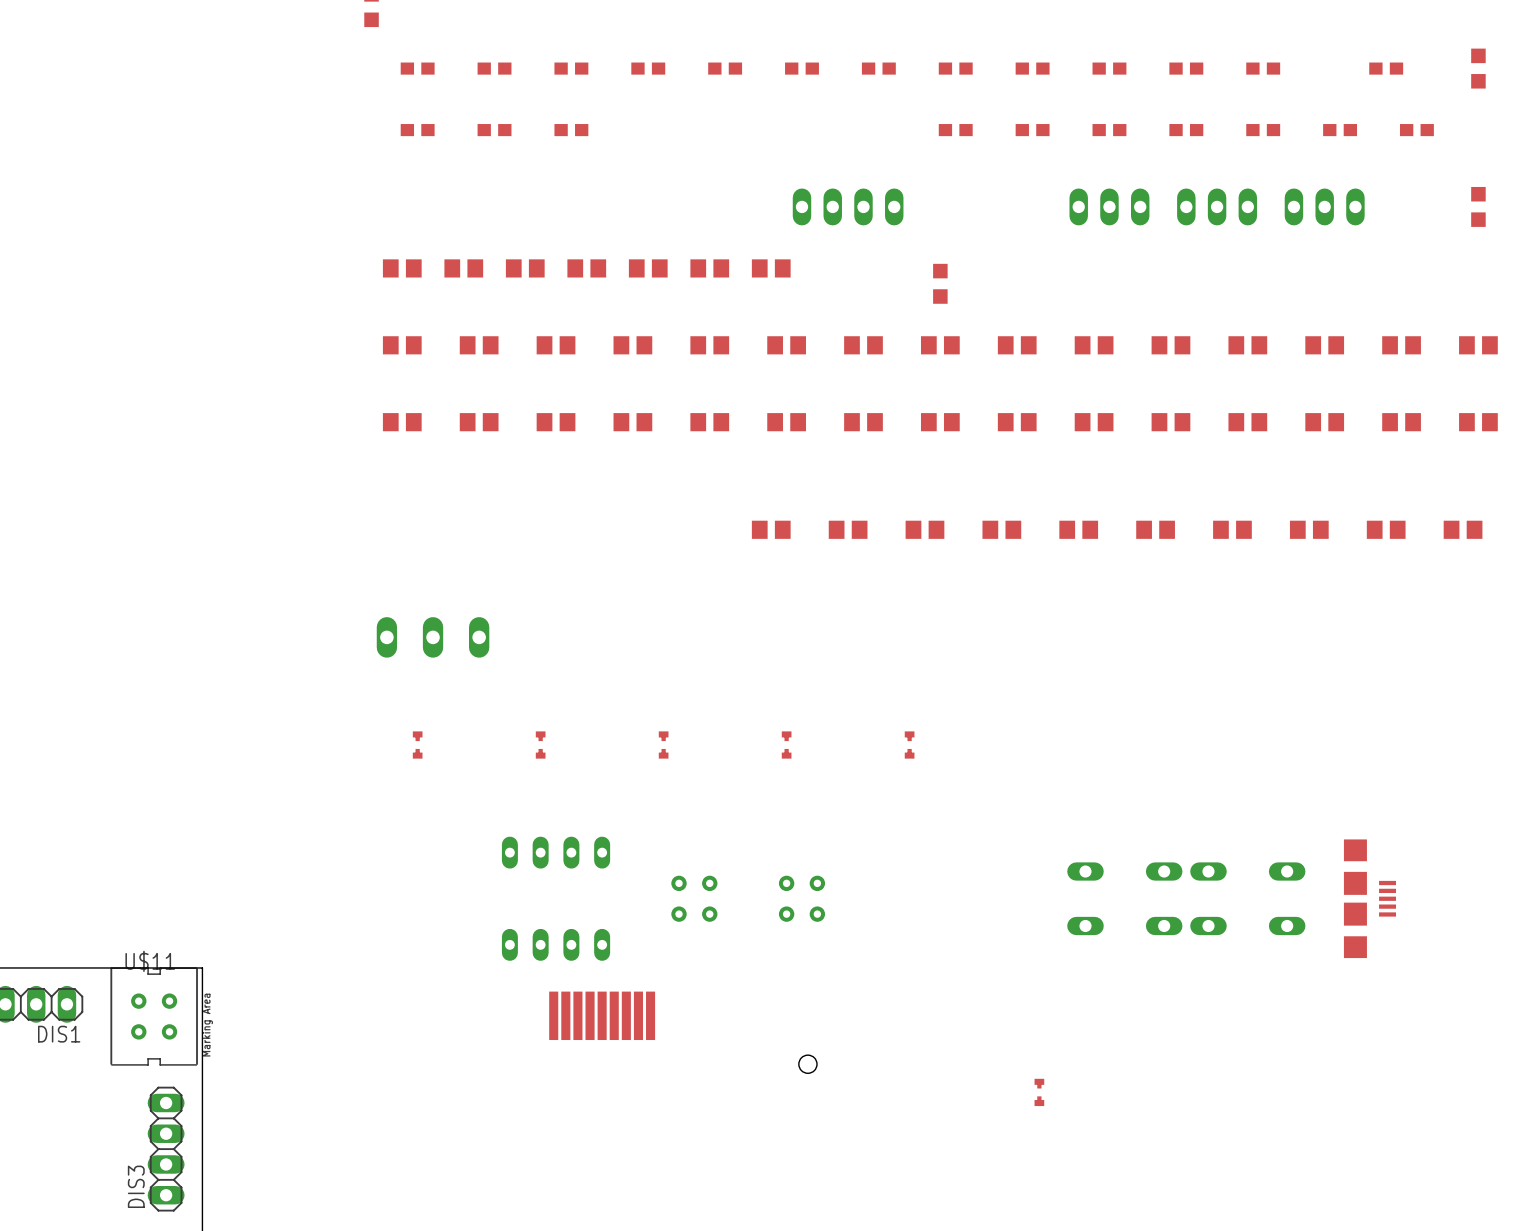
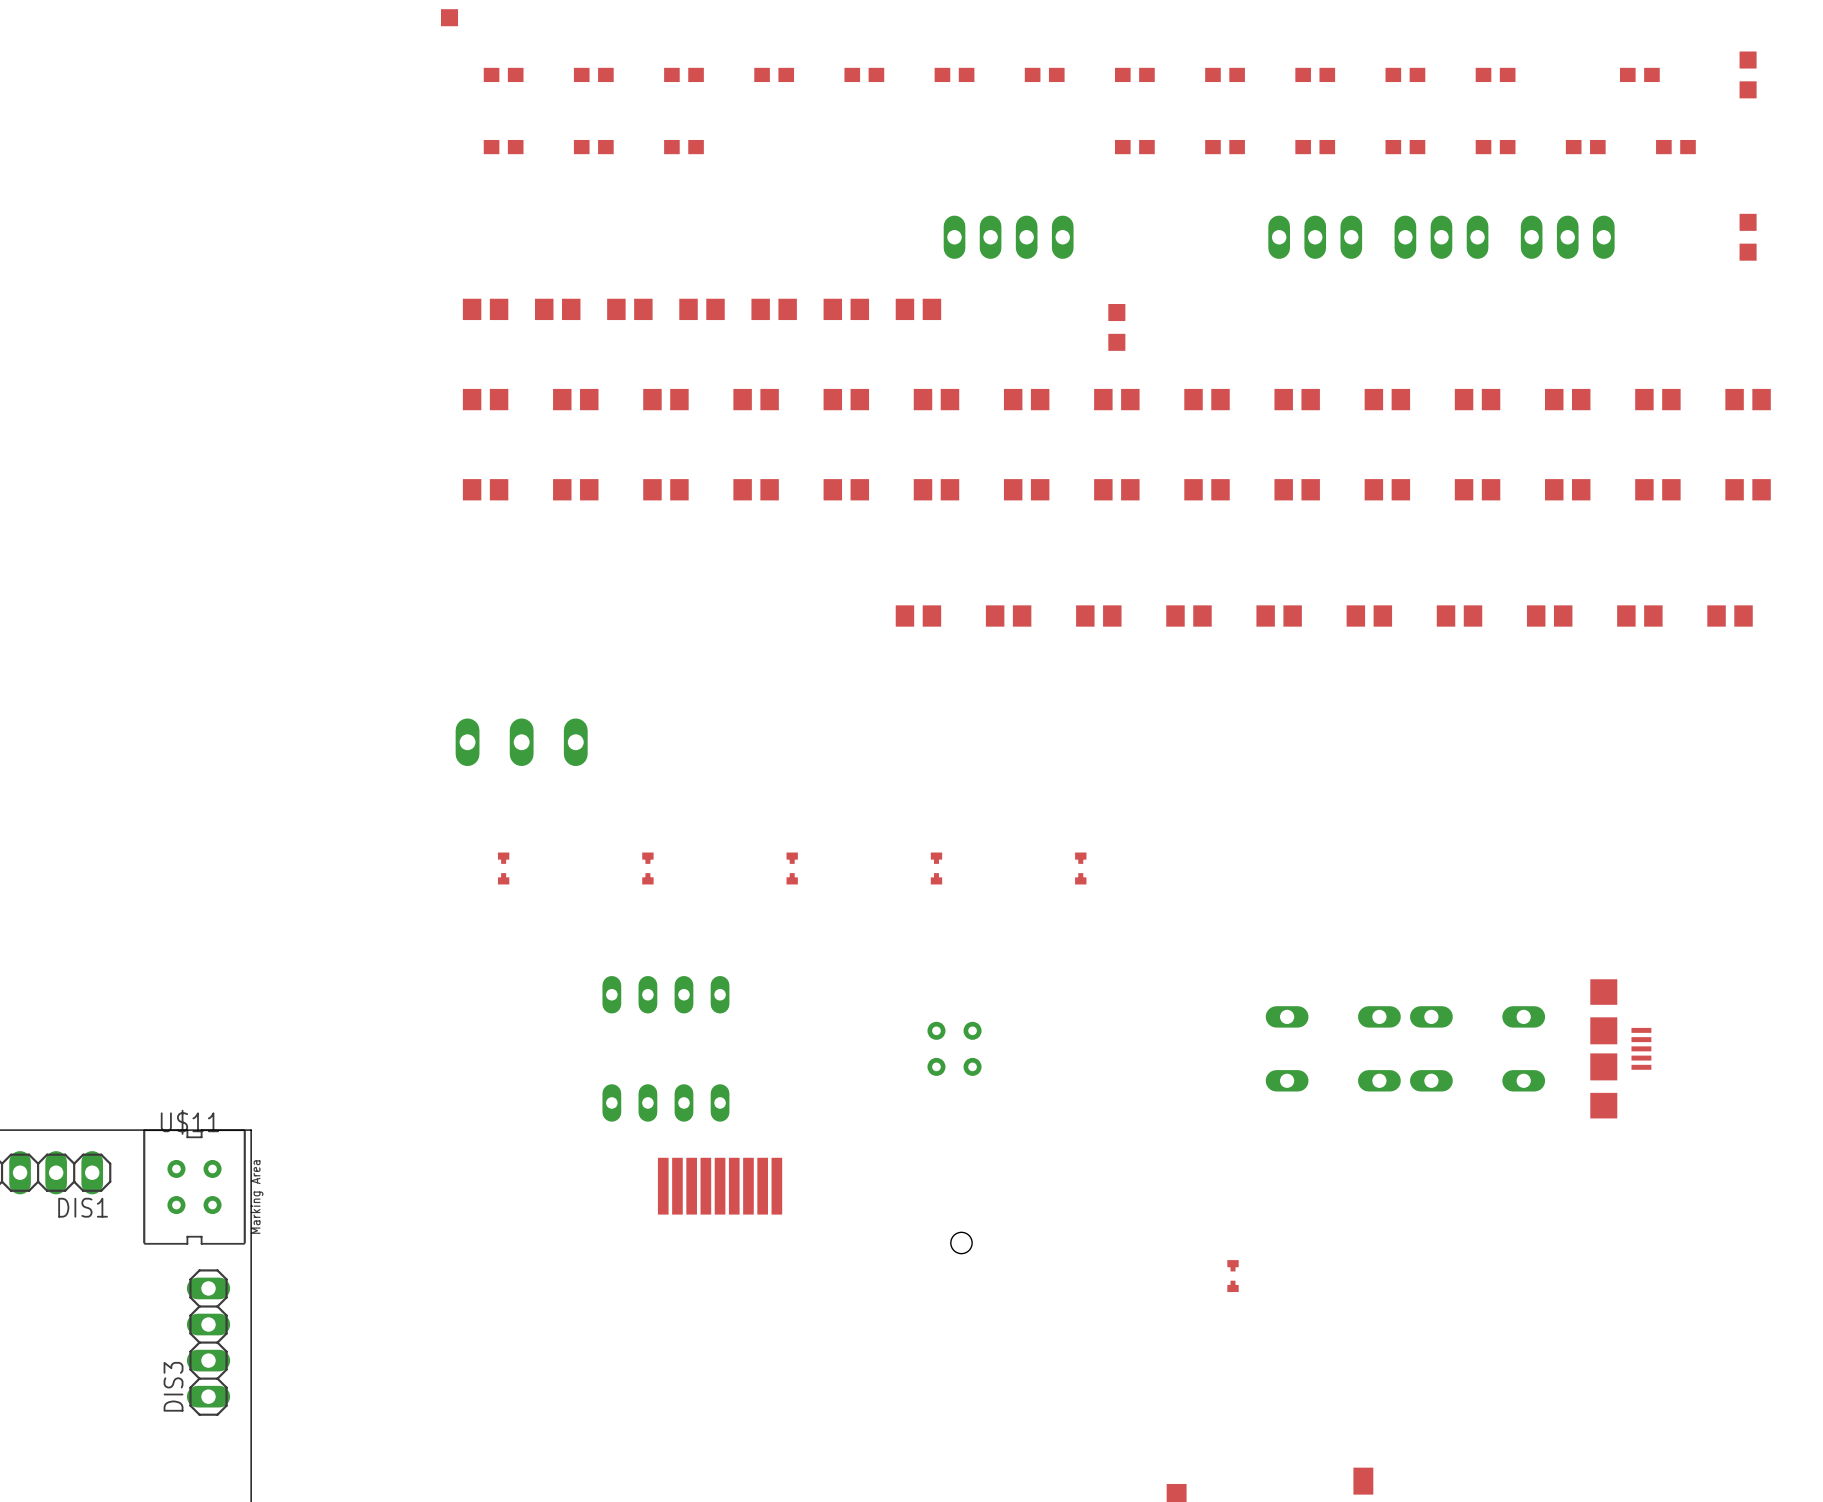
part: (694, 898) -> none

